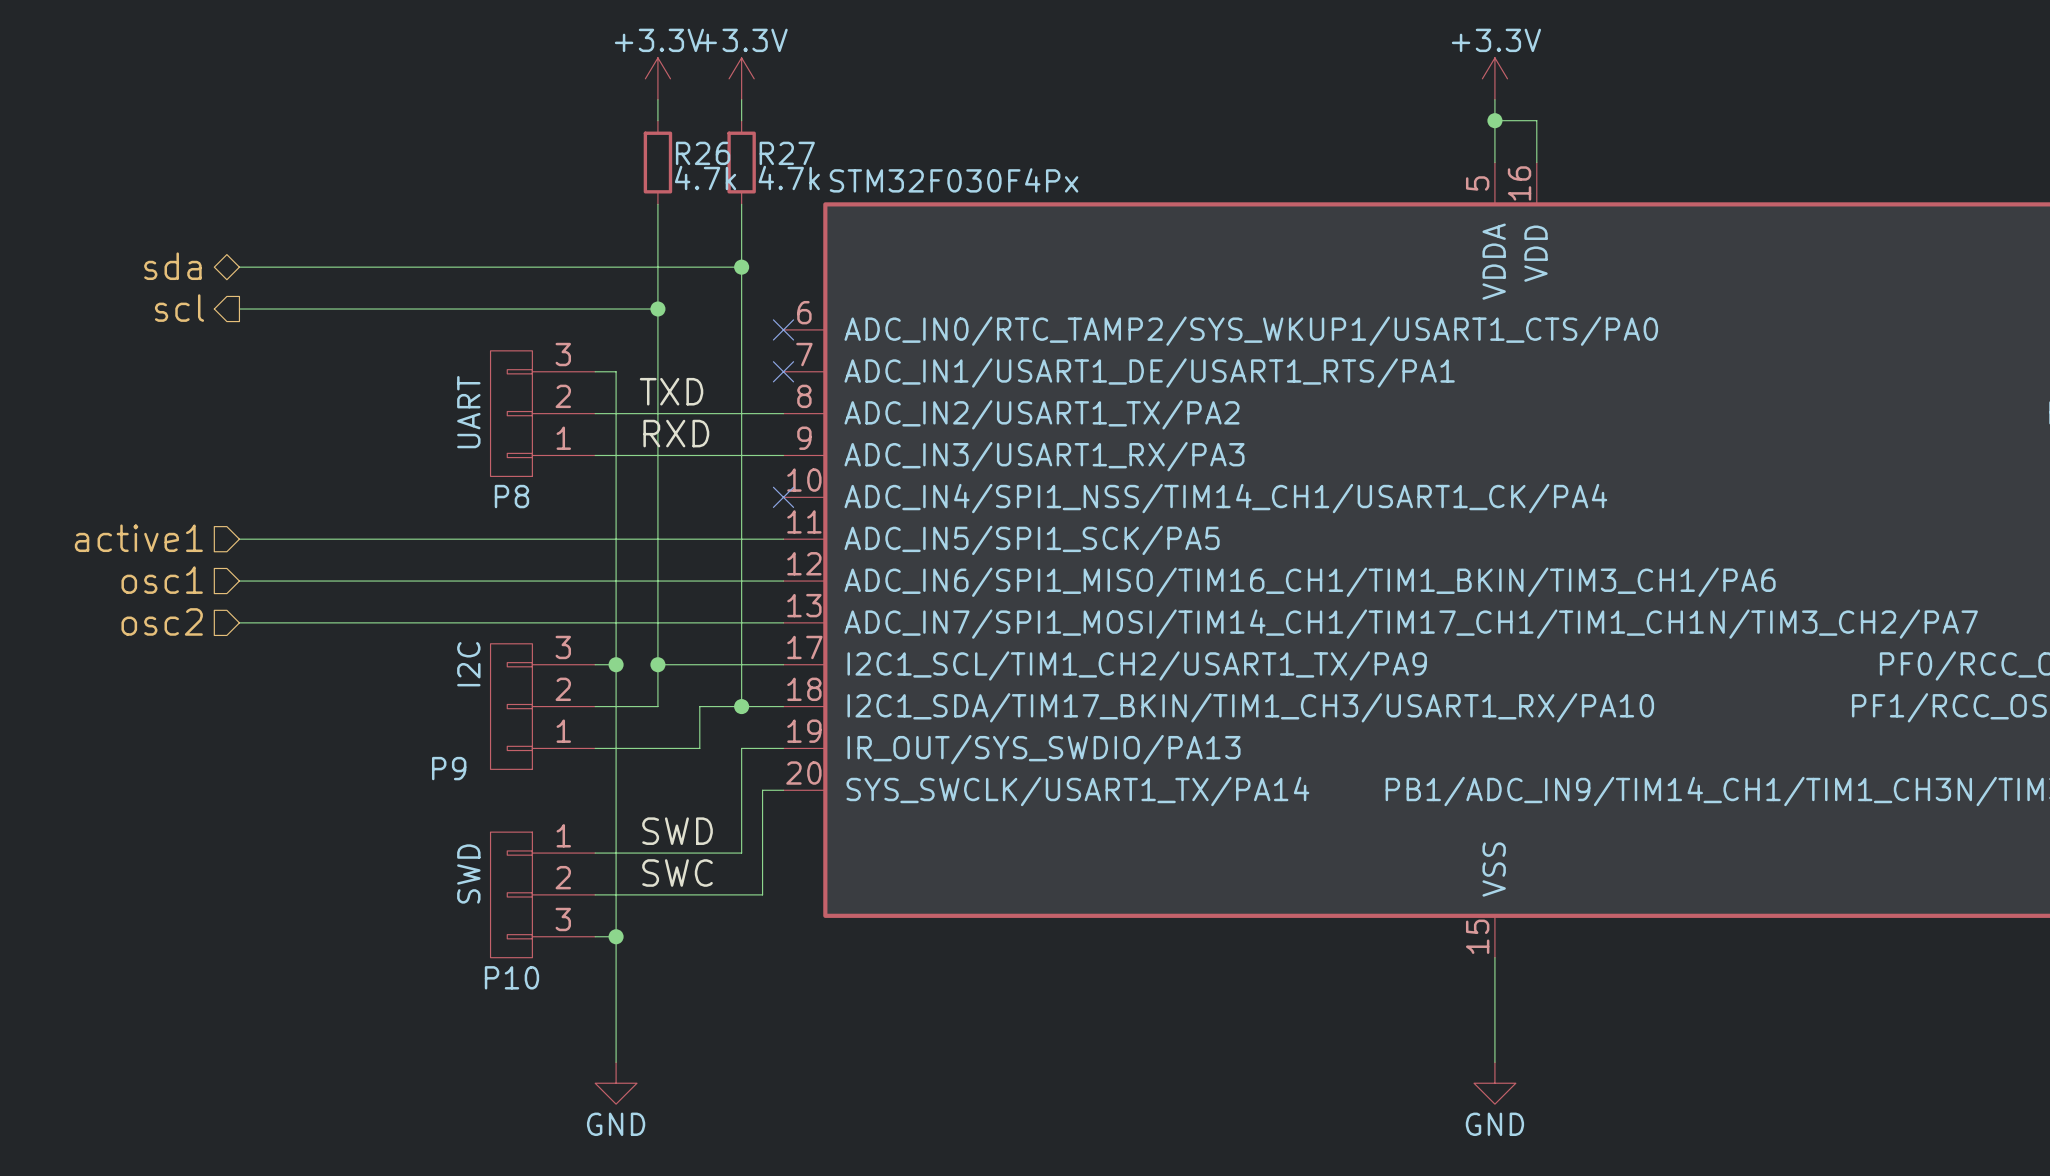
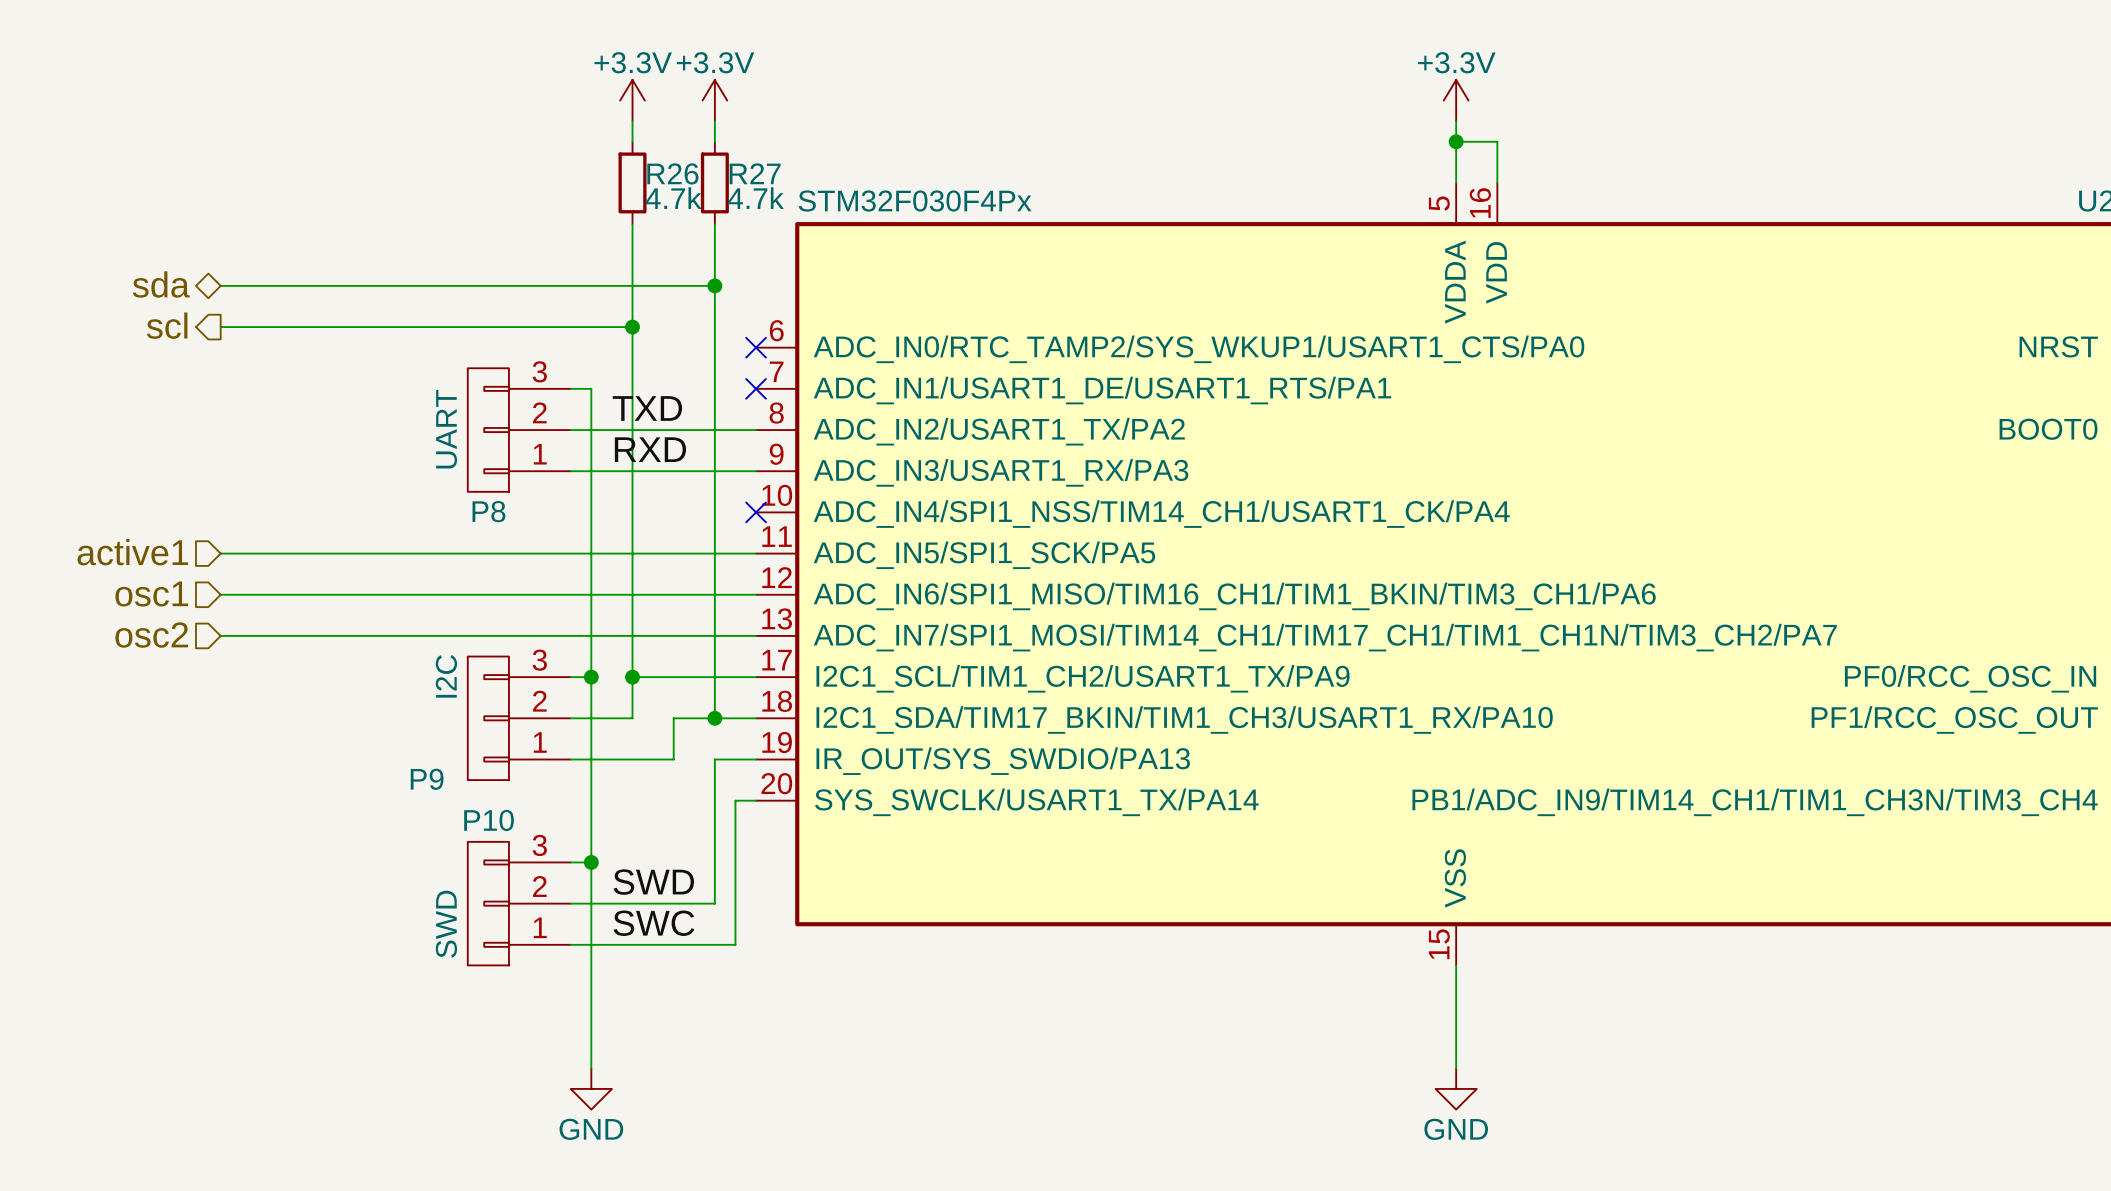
label: SWD (677, 831) -> none
wire: (616, 853) (741, 853) -> none
label: SWC (677, 873) -> SWD (653, 882)
P10 flip: as is (511, 894) -> up-down (488, 903)
wire: (741, 894) (762, 894) -> (714, 903) (714, 862)
wire: none -> (735, 903) (735, 944) (591, 944)
label: none -> SWC (653, 923)
junction position: (616, 936) -> (591, 862)

